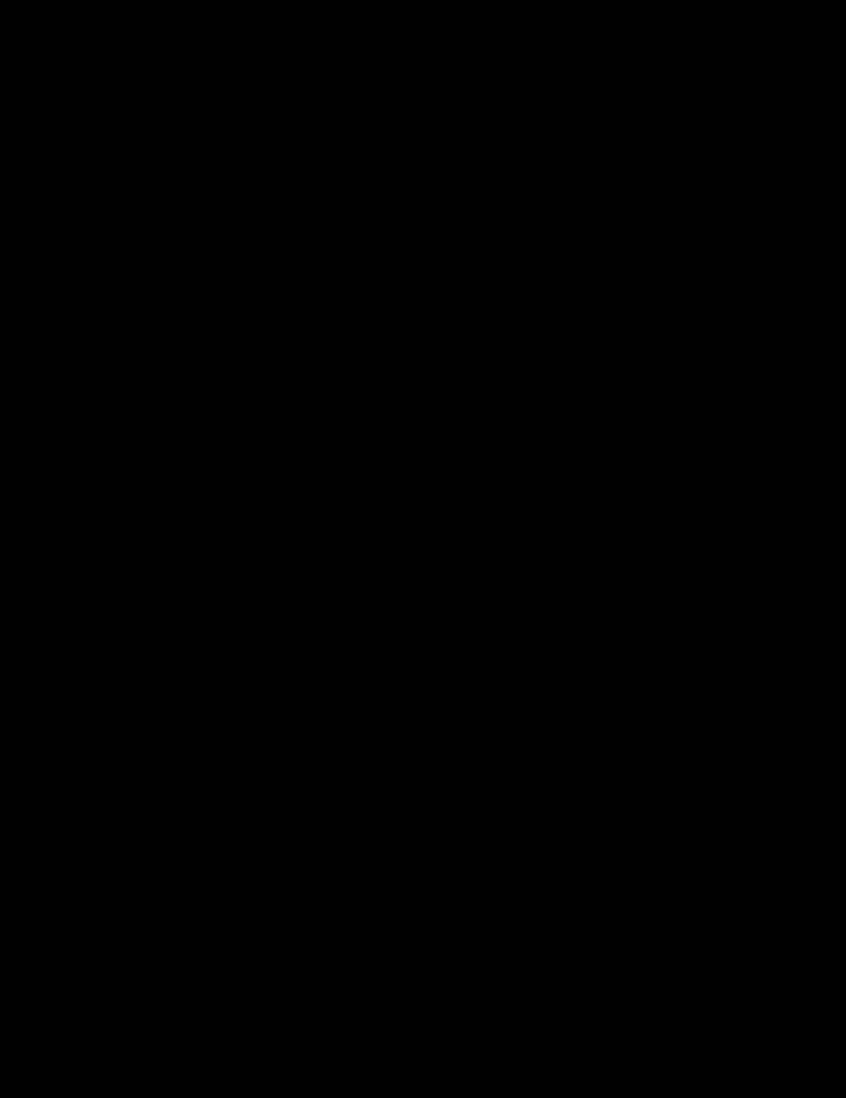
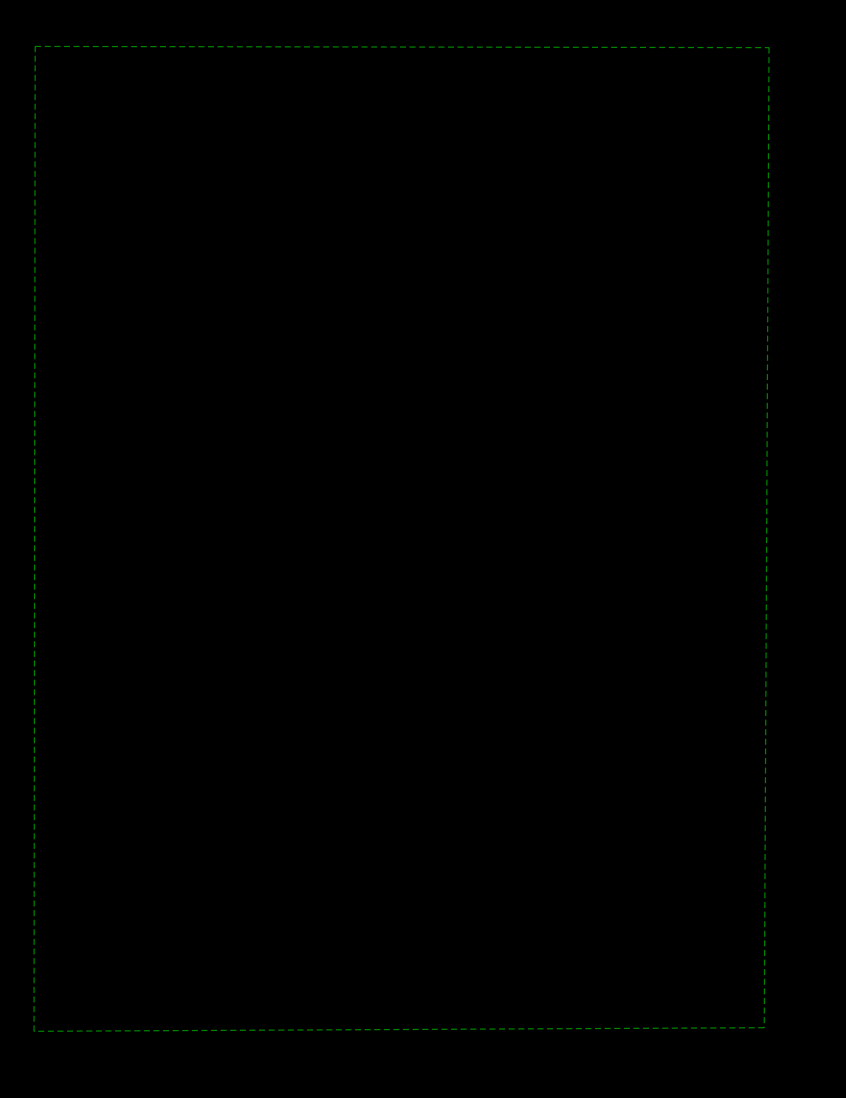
zone outline: none -> (35, 46) (769, 47) (764, 1027) (34, 1031) (35, 46)

